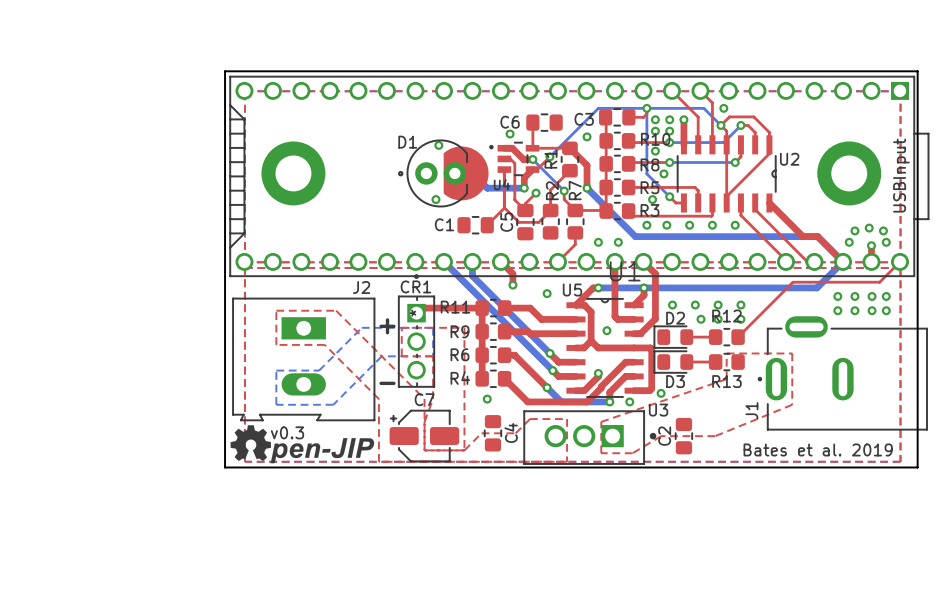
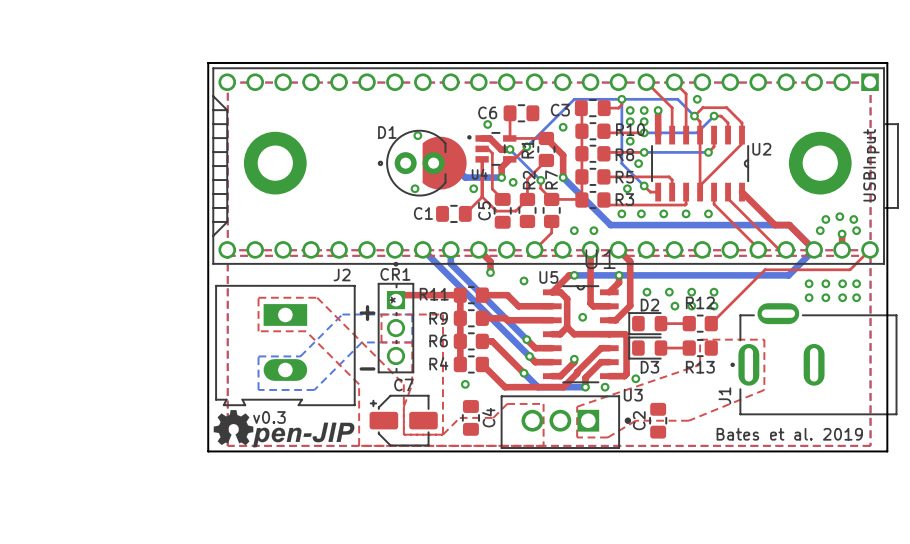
top track: (536, 193) (525, 203) (525, 210) -> none
via: none -> (473, 188)

